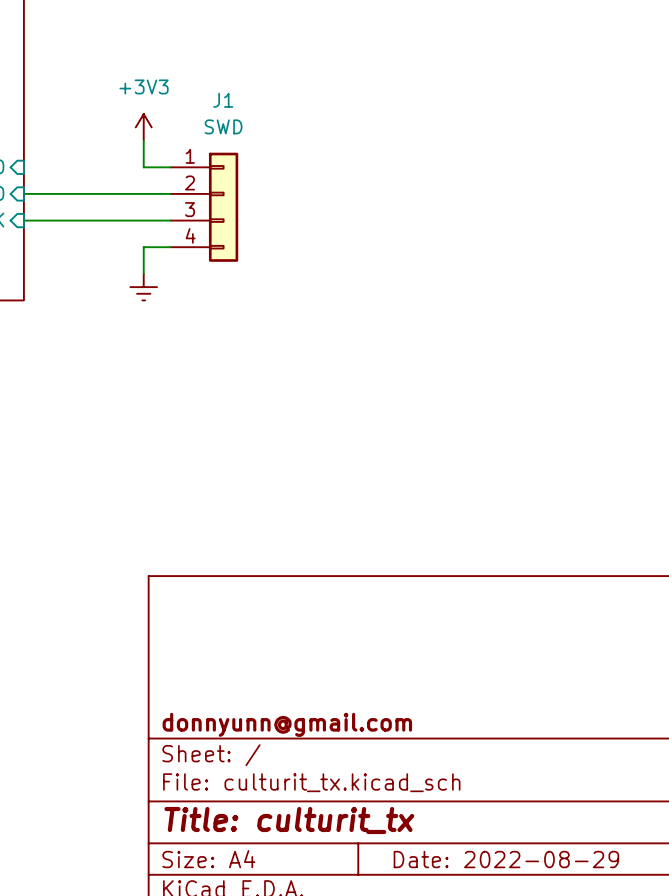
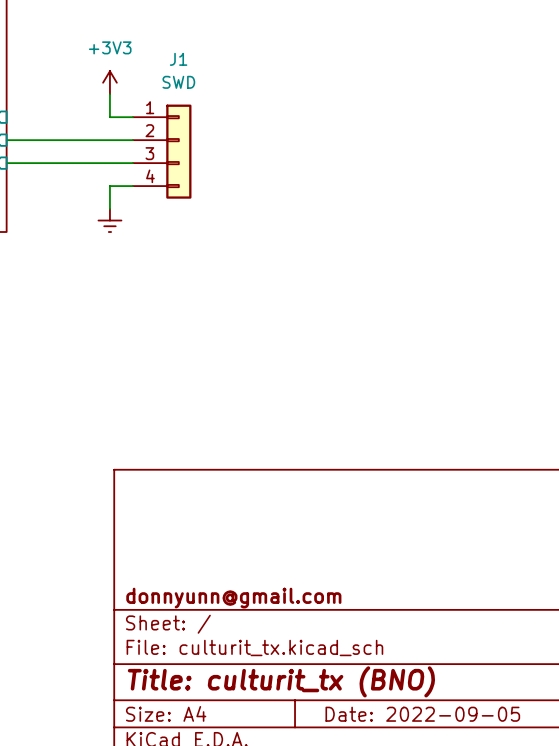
title block: Title: culturit_tx (289, 820) -> Title: culturit_tx (BNO) (281, 681)
title block: Date: 2022-08-29 (506, 859) -> Date: 2022-09-05 (422, 714)

